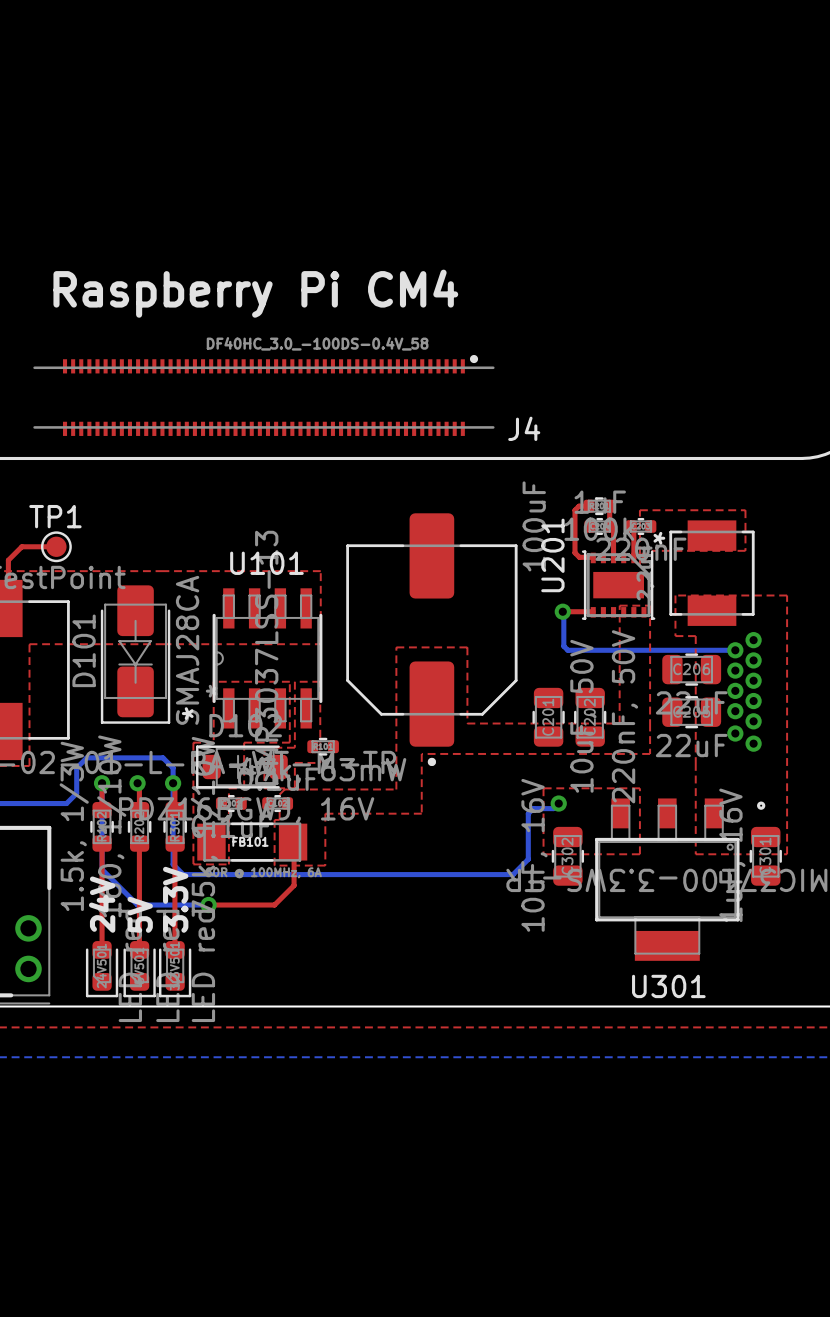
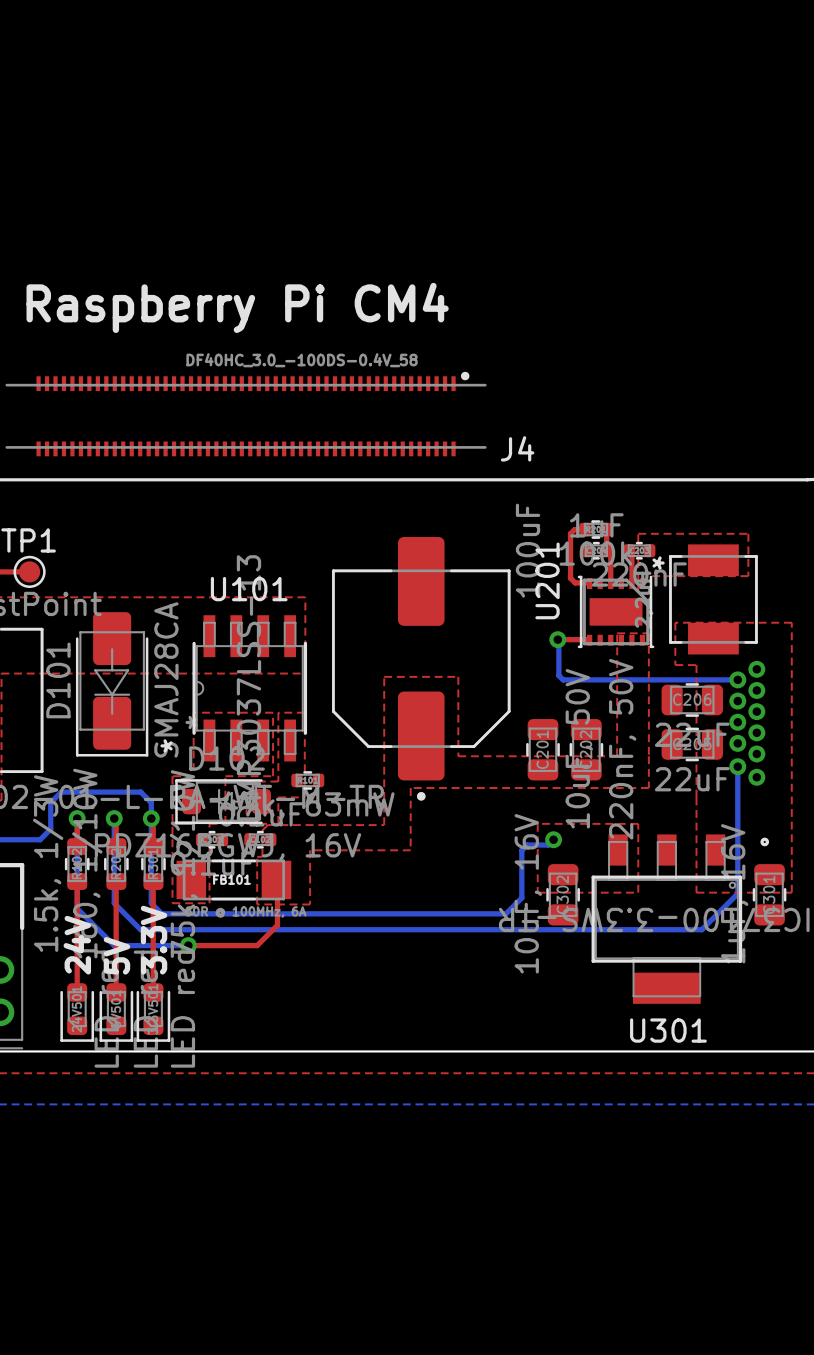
bottom track: none -> (737, 766) (737, 893) (701, 929) (140, 929) (114, 903) (114, 818)

